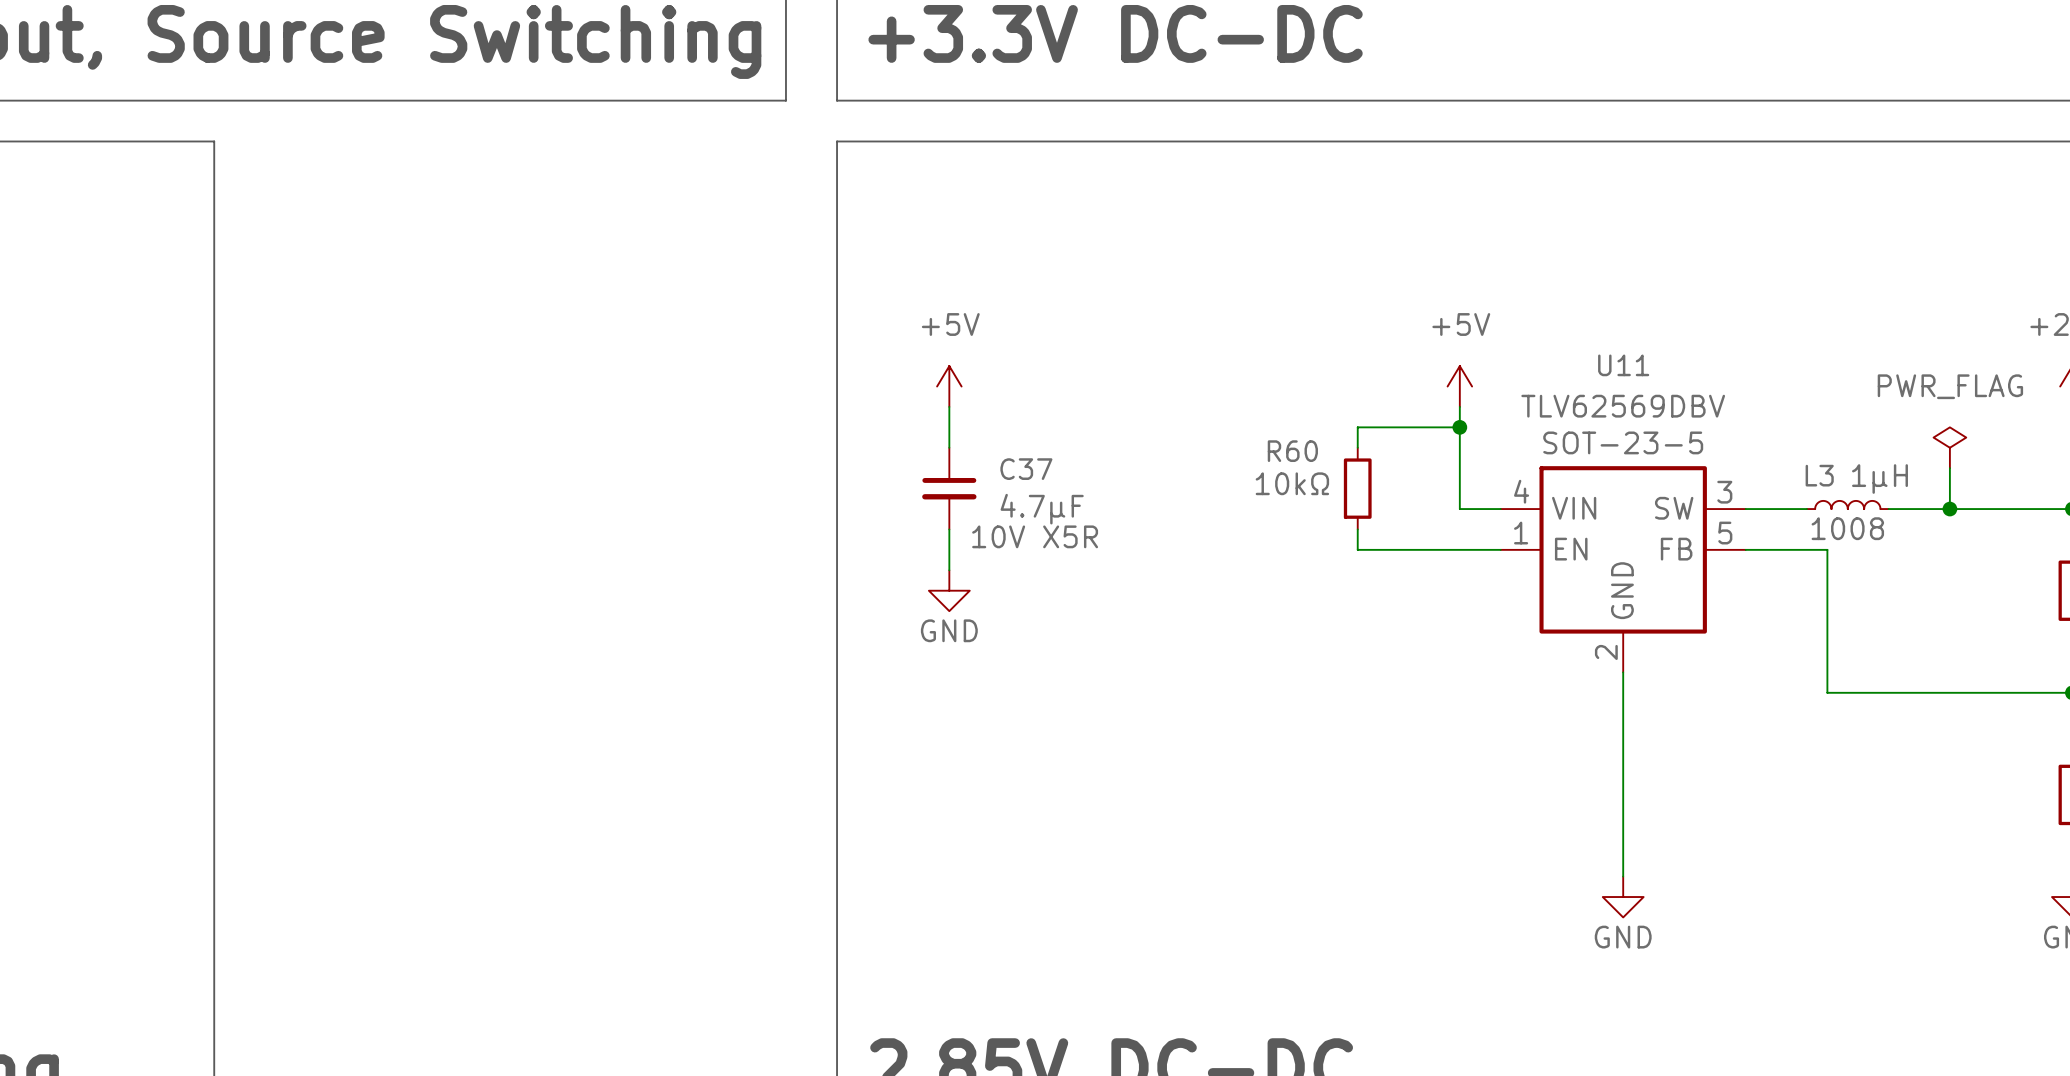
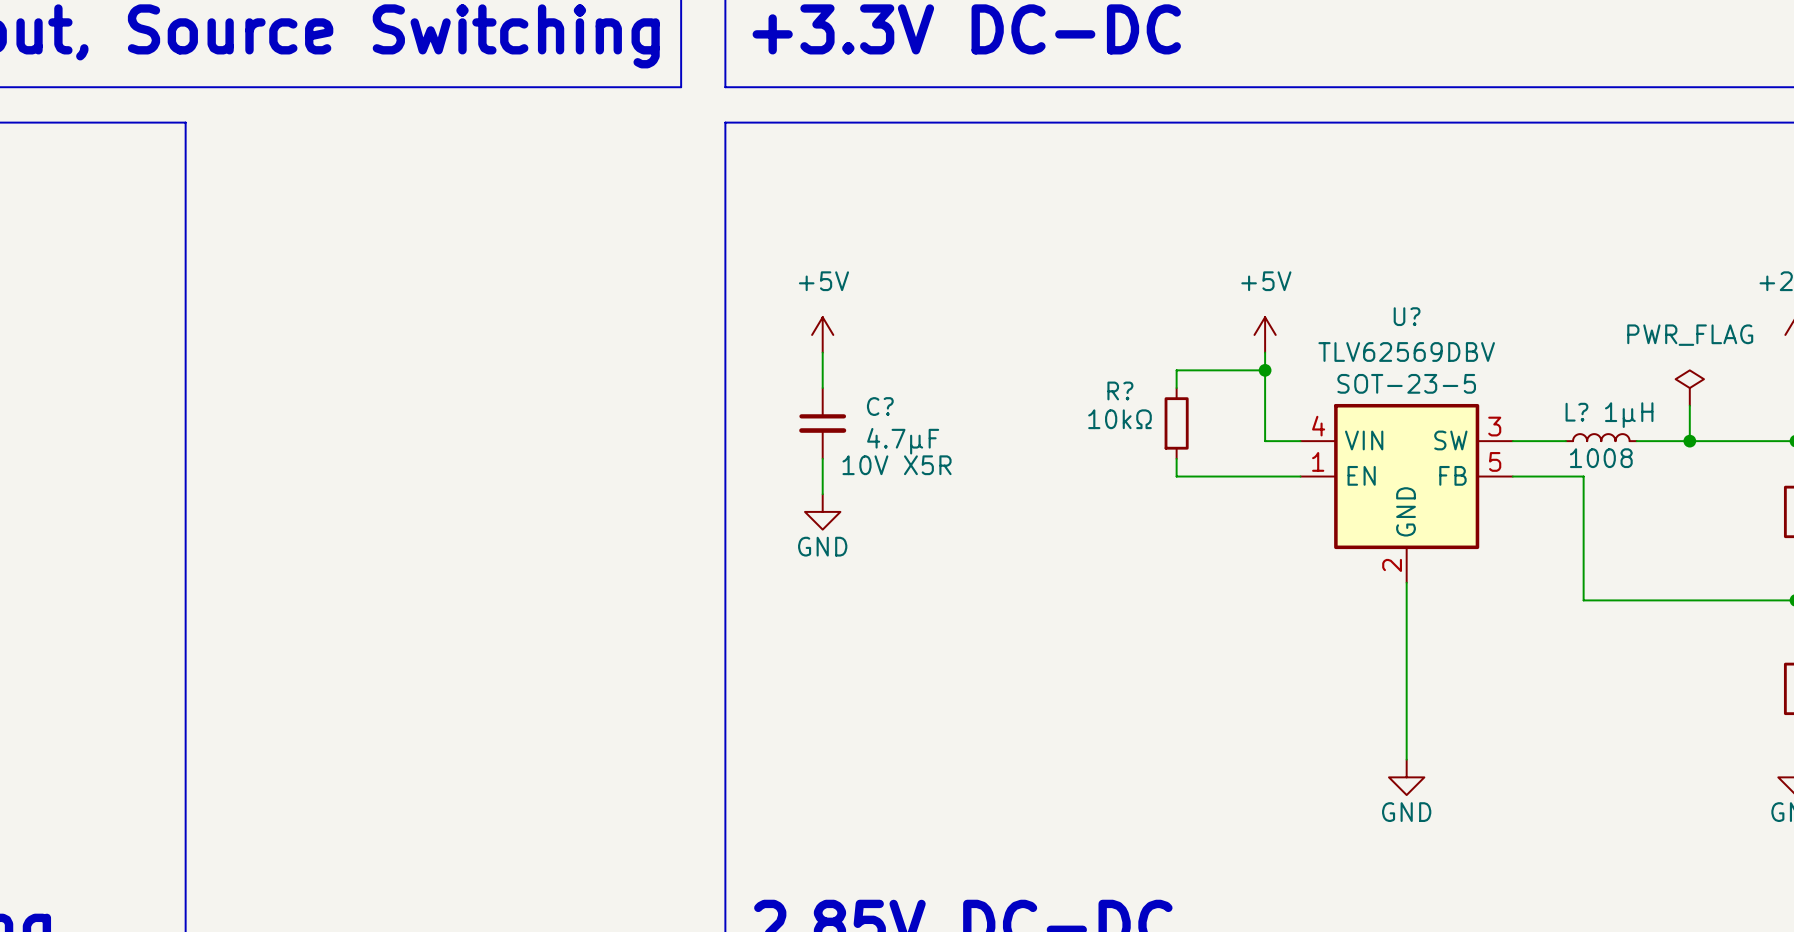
U11 name: U11 (1623, 365) -> U? (1407, 316)
R60 name: R60 (1292, 451) -> R? (1120, 390)
C37 name: C37 (1026, 469) -> C? (880, 406)
L3 name: L3 (1819, 475) -> L? (1576, 412)

